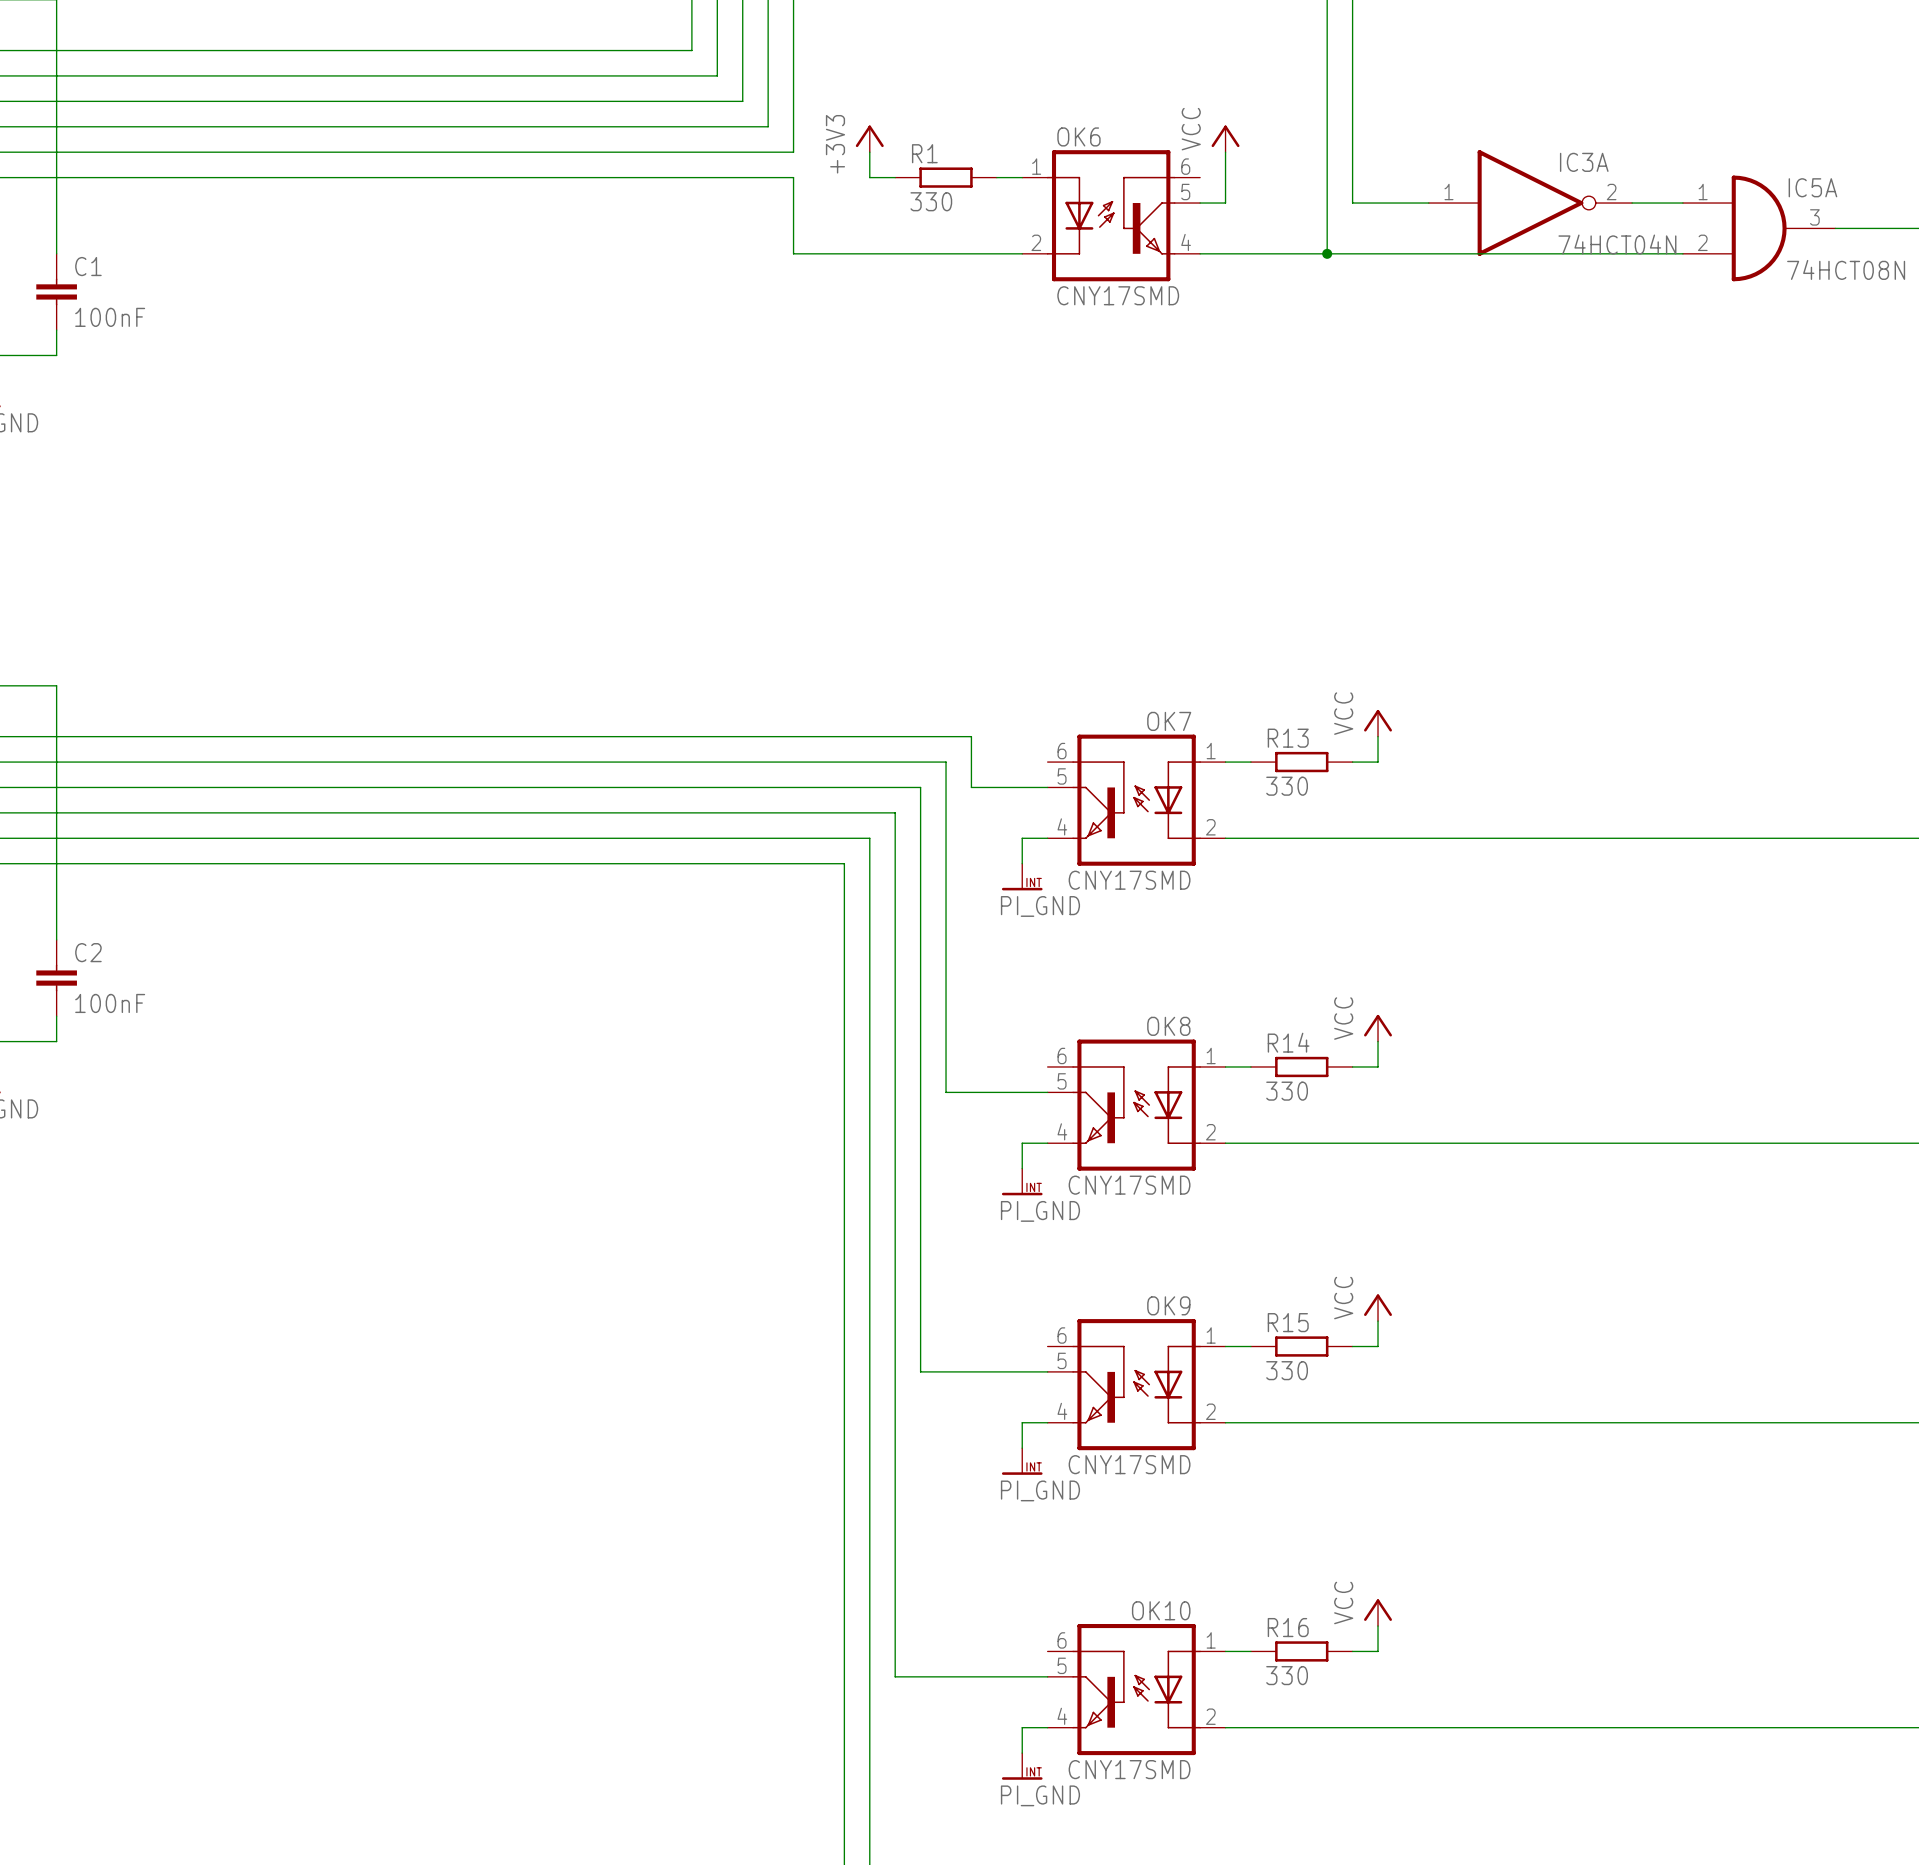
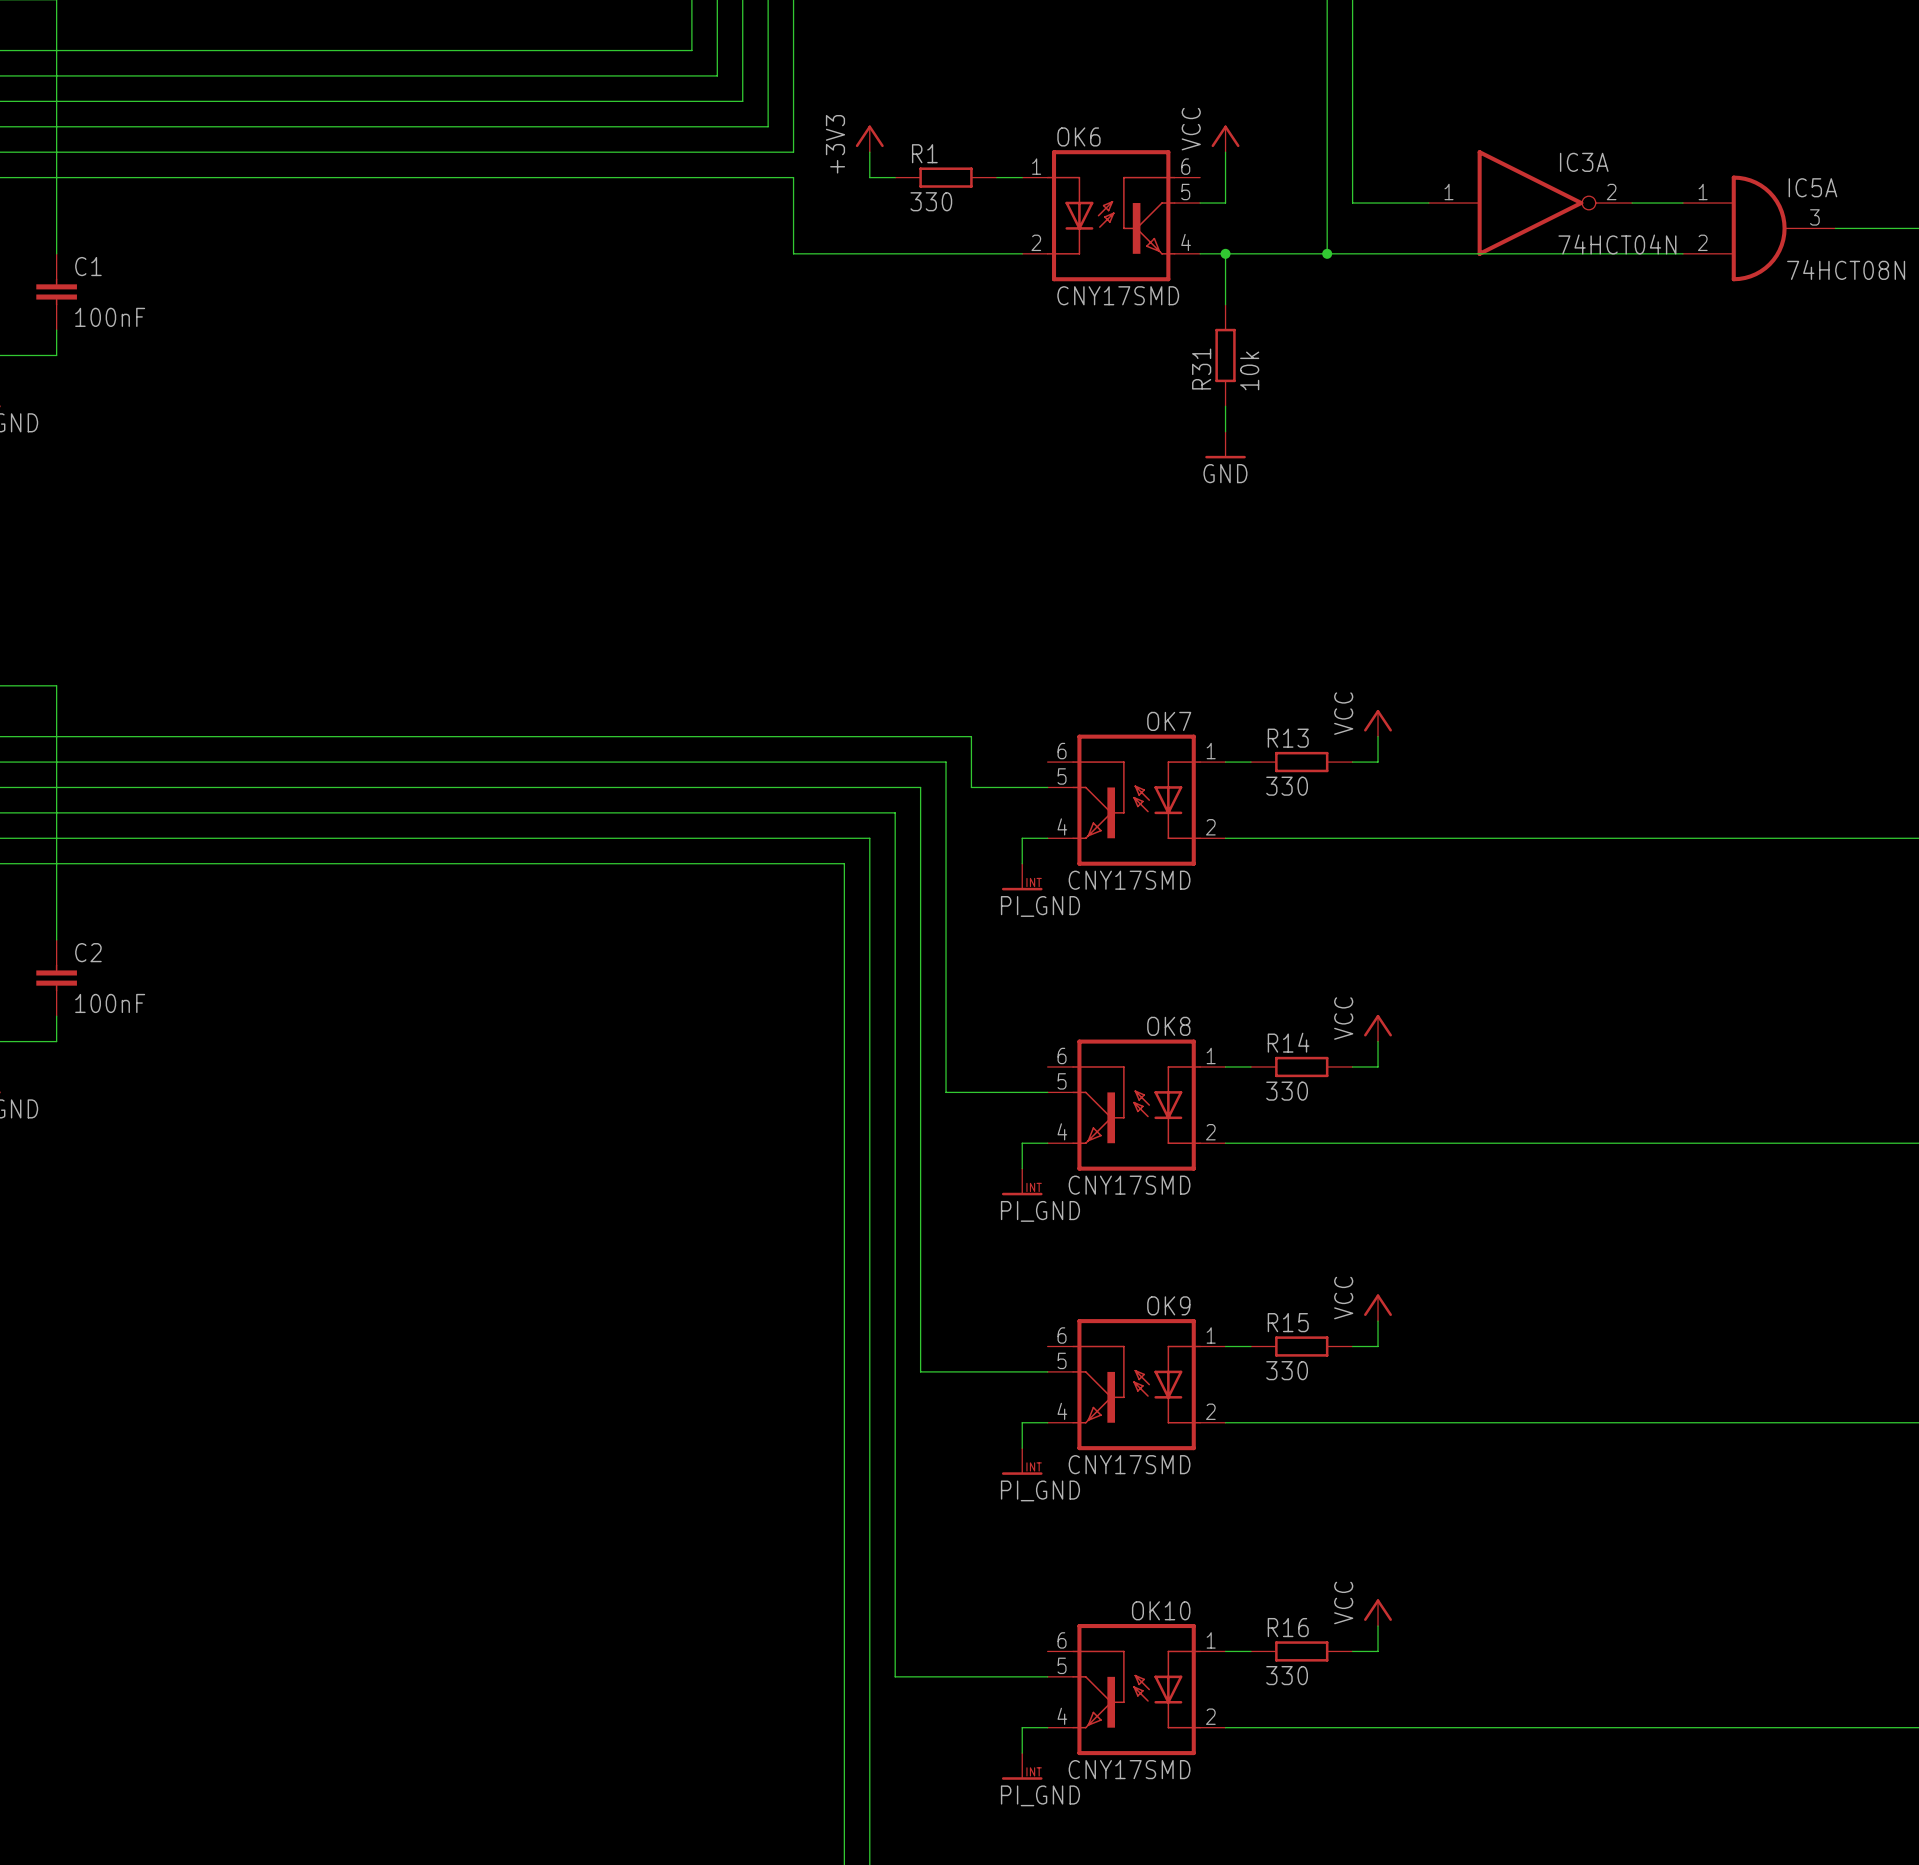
wire: none -> (1225, 253) (1225, 304)
junction: none -> (1225, 253)
R31: none -> 10k (1225, 355)
wire: none -> (1225, 406) (1225, 431)
power symbol: none -> GND (1225, 445)

